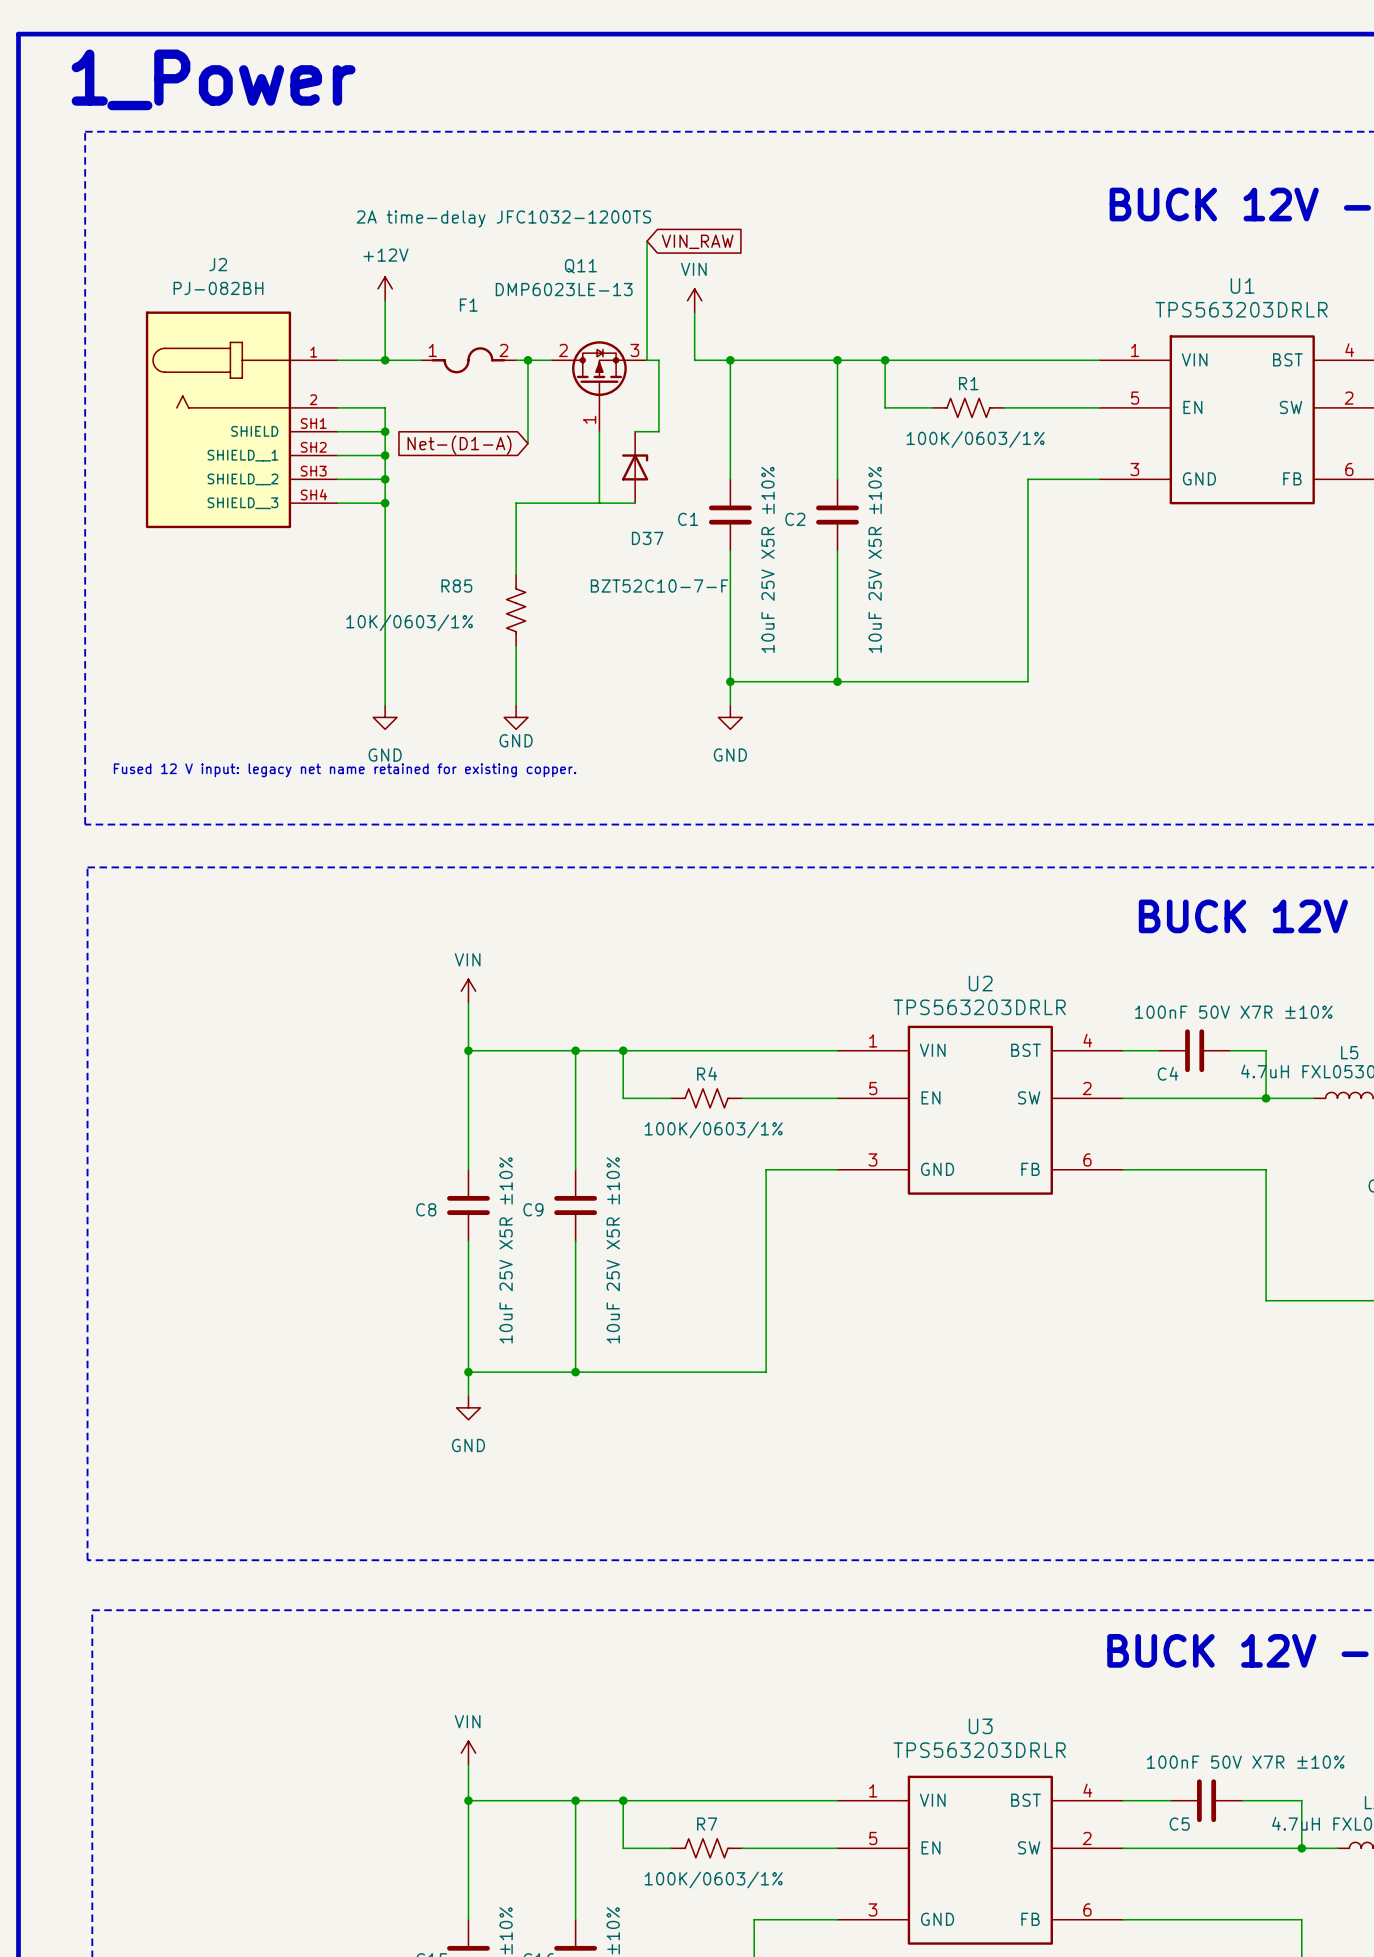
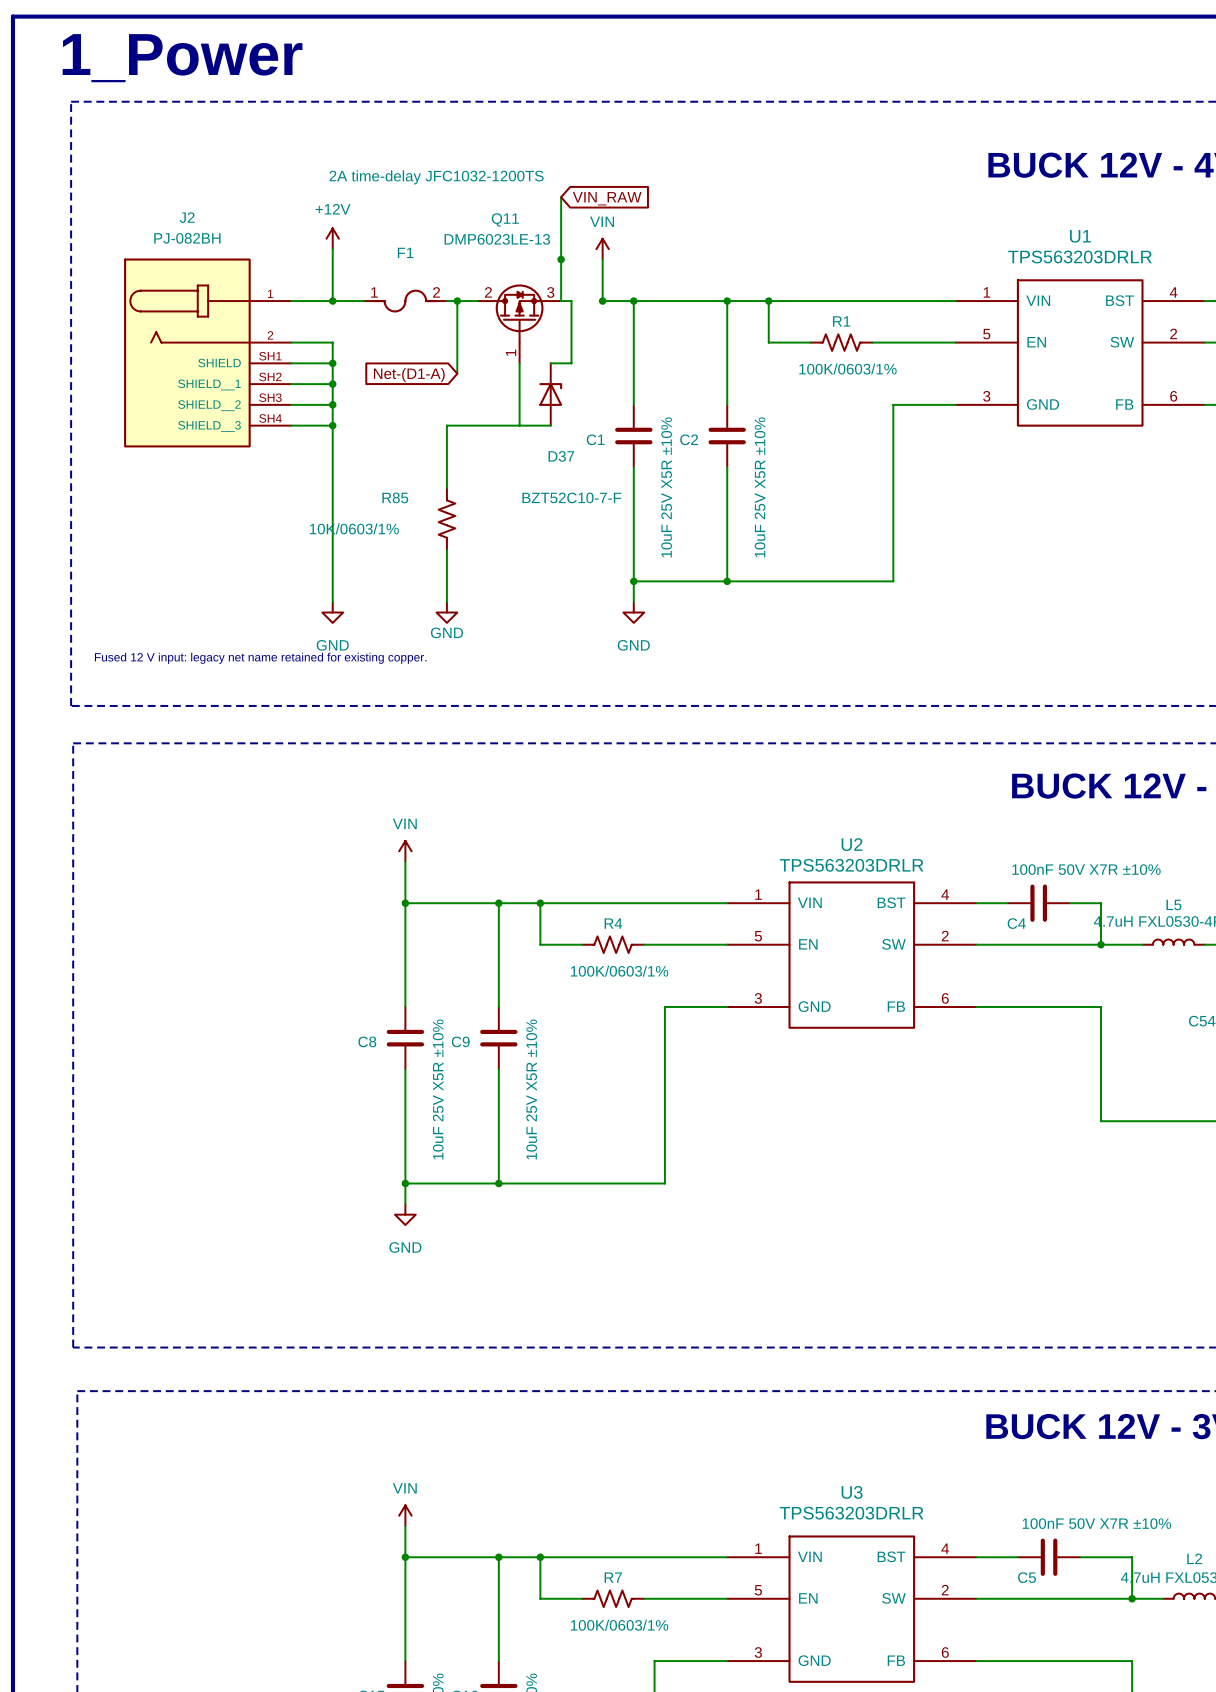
junction: none -> (561, 259)
junction: none -> (602, 301)

